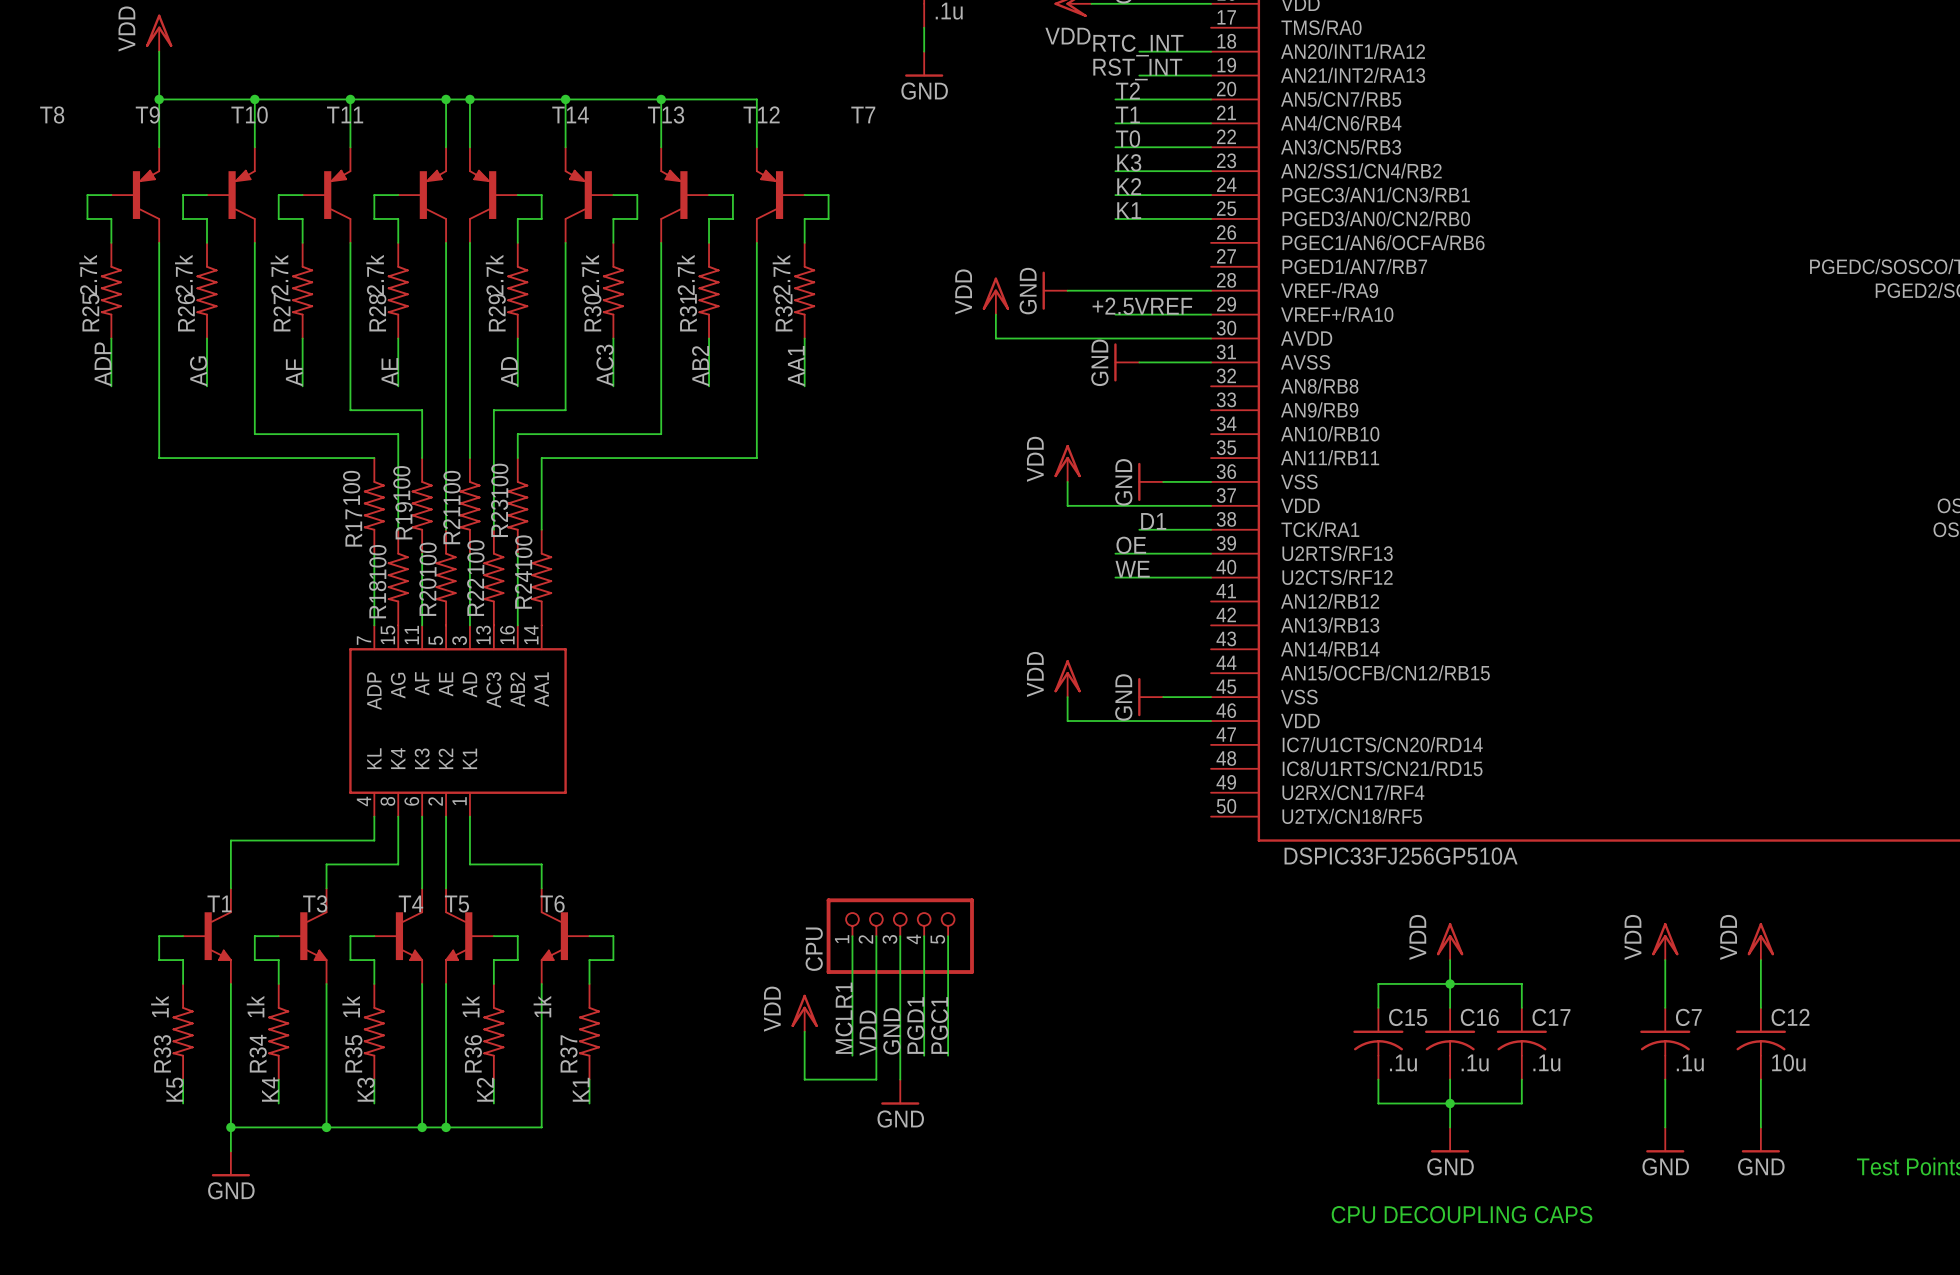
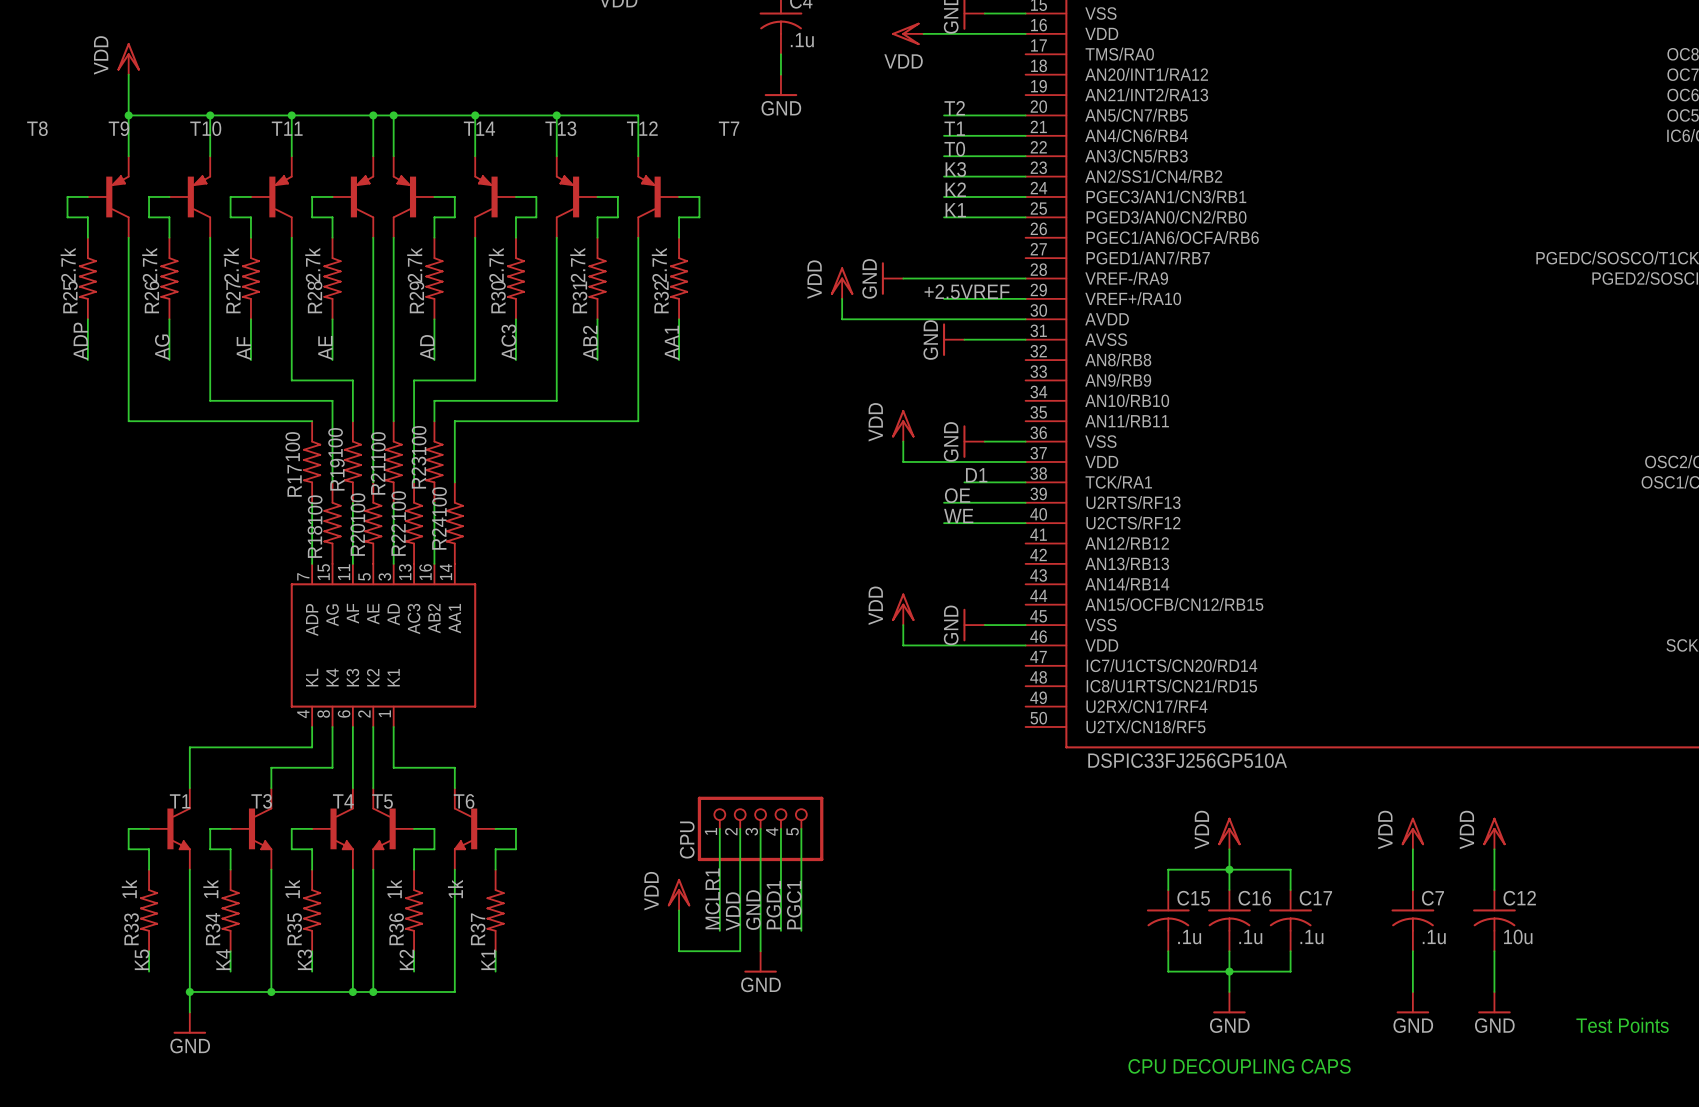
label: RTC_INT (1138, 45) -> none
wire: (1139, 51) (1211, 51) -> none
label: RST_INT (1137, 69) -> none
wire: (1139, 75) (1211, 75) -> none

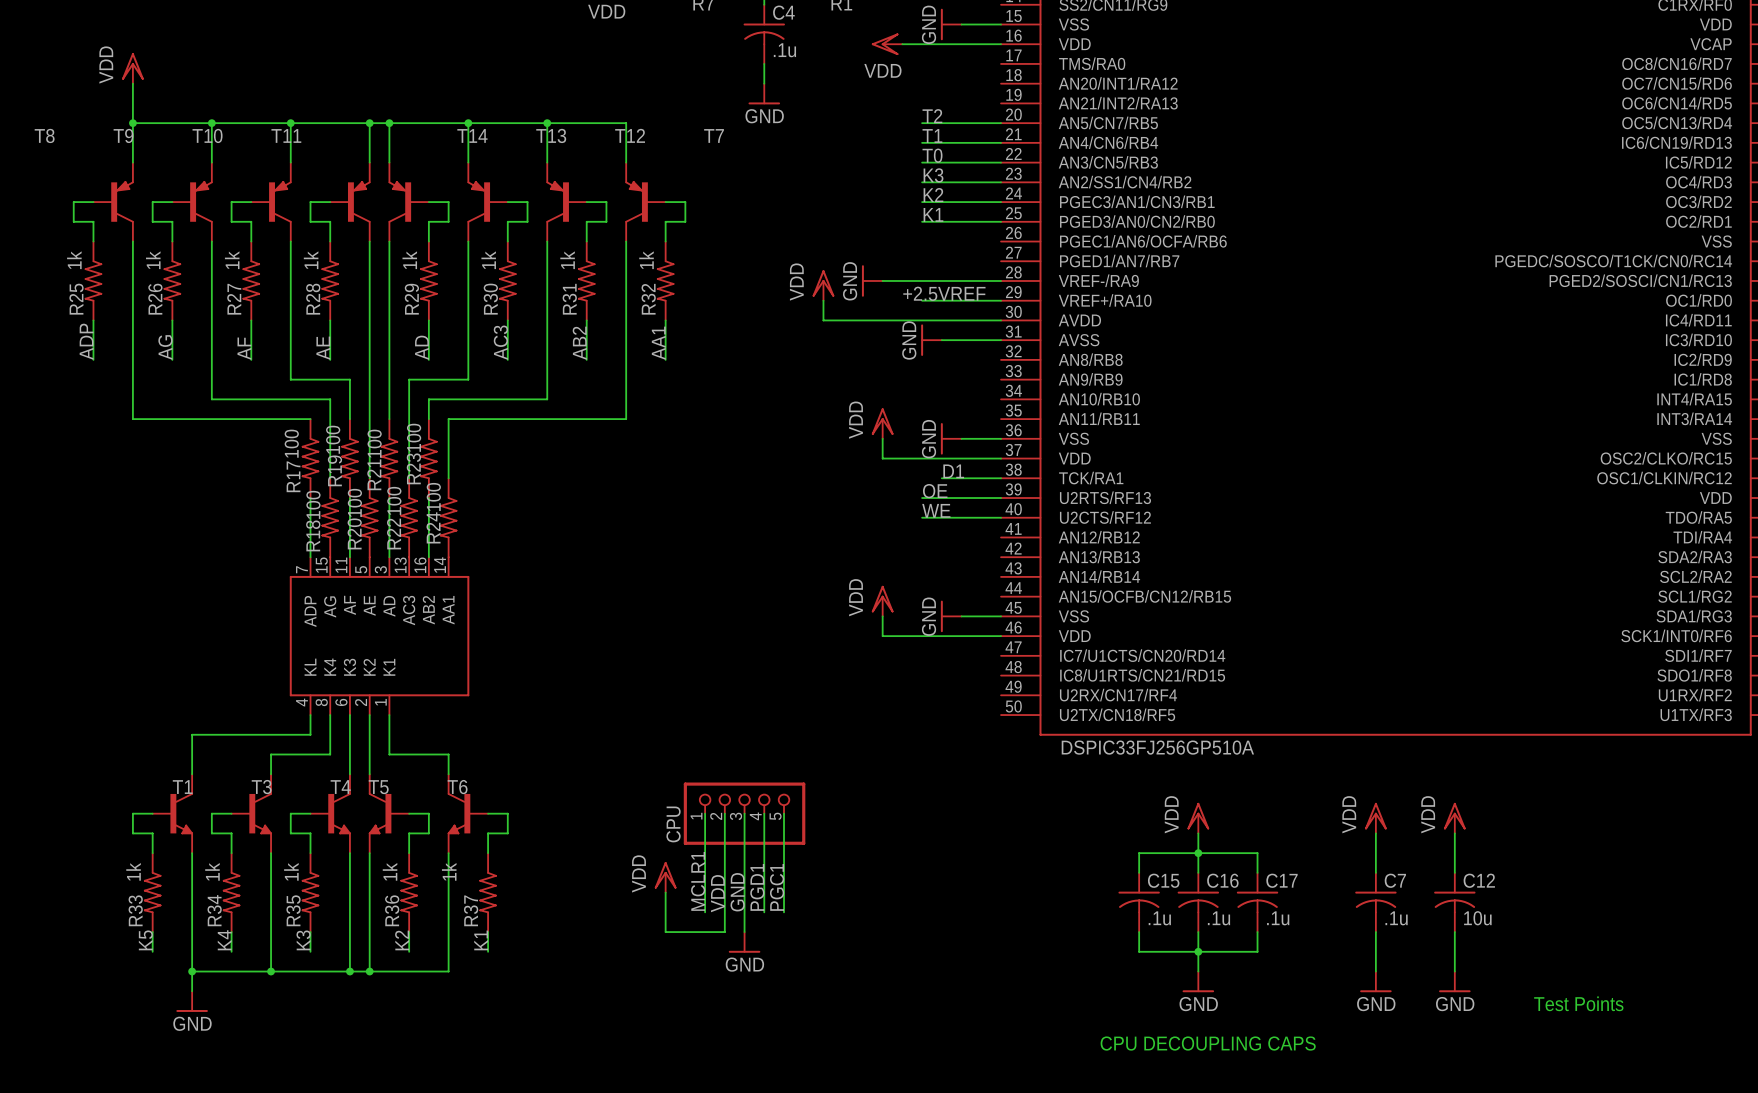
R25 value: 2.7k (68, 265) -> 1k (74, 260)
R26 value: 2.7k (149, 265) -> 1k (153, 260)
R27 value: 2.7k (231, 265) -> 1k (232, 260)
R28 value: 2.7k (312, 265) -> 1k (311, 260)
R29 value: 2.7k (414, 265) -> 1k (409, 260)
R30 value: 2.7k (496, 265) -> 1k (488, 260)
R31 value: 2.7k (577, 265) -> 1k (567, 260)
R32 value: 2.7k (659, 265) -> 1k (646, 260)

